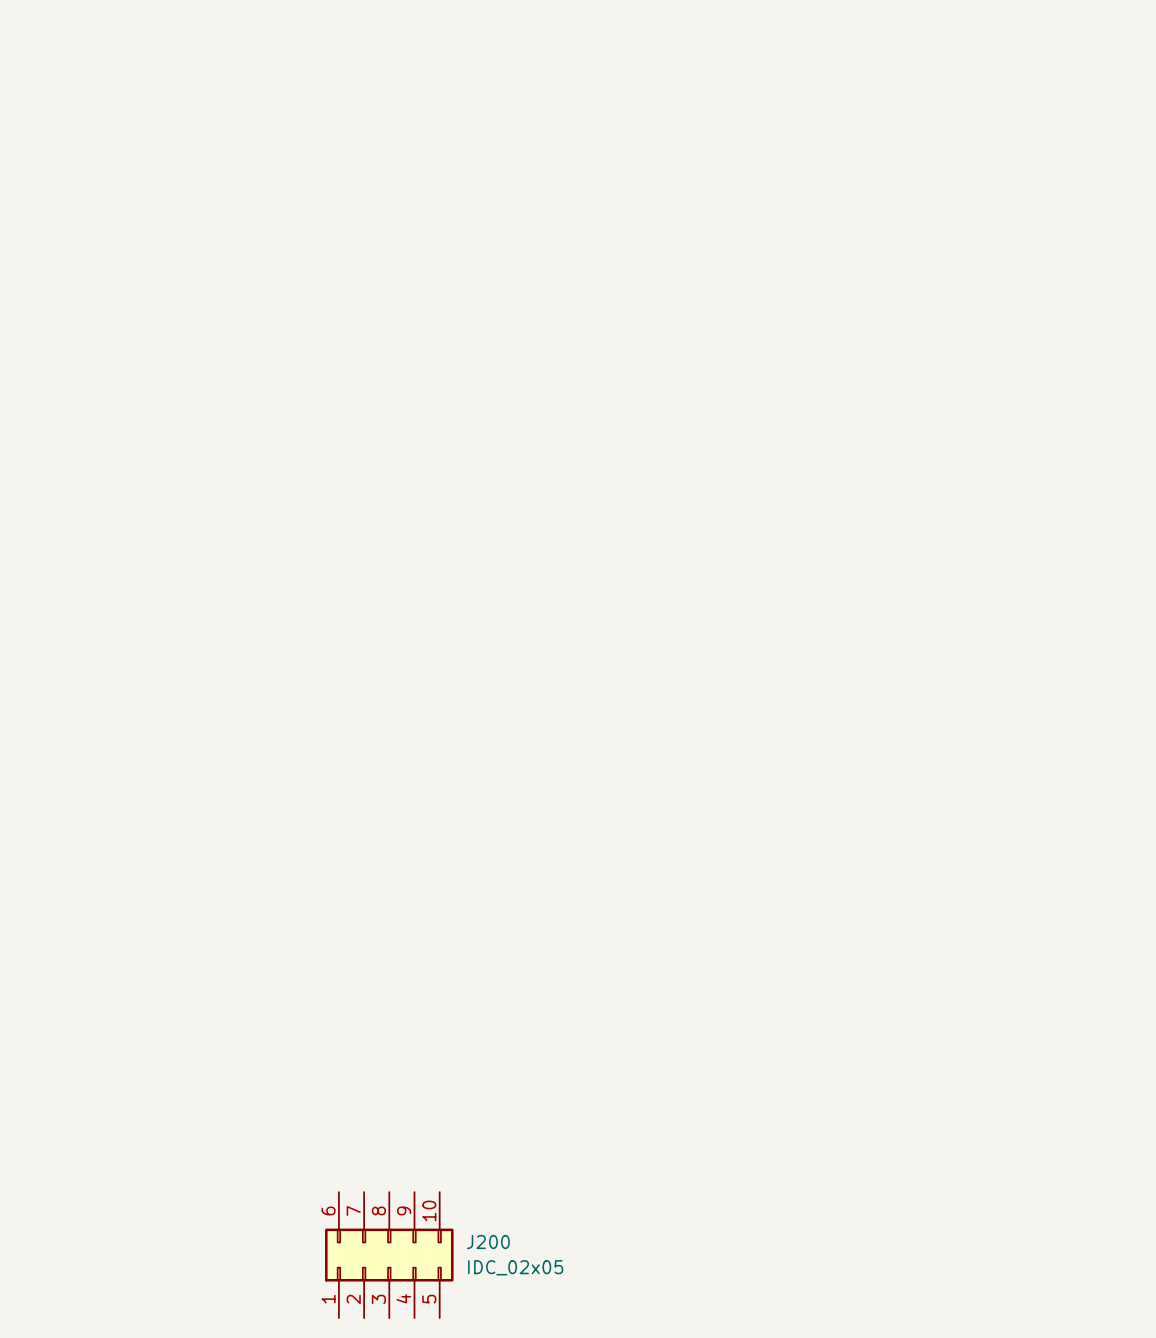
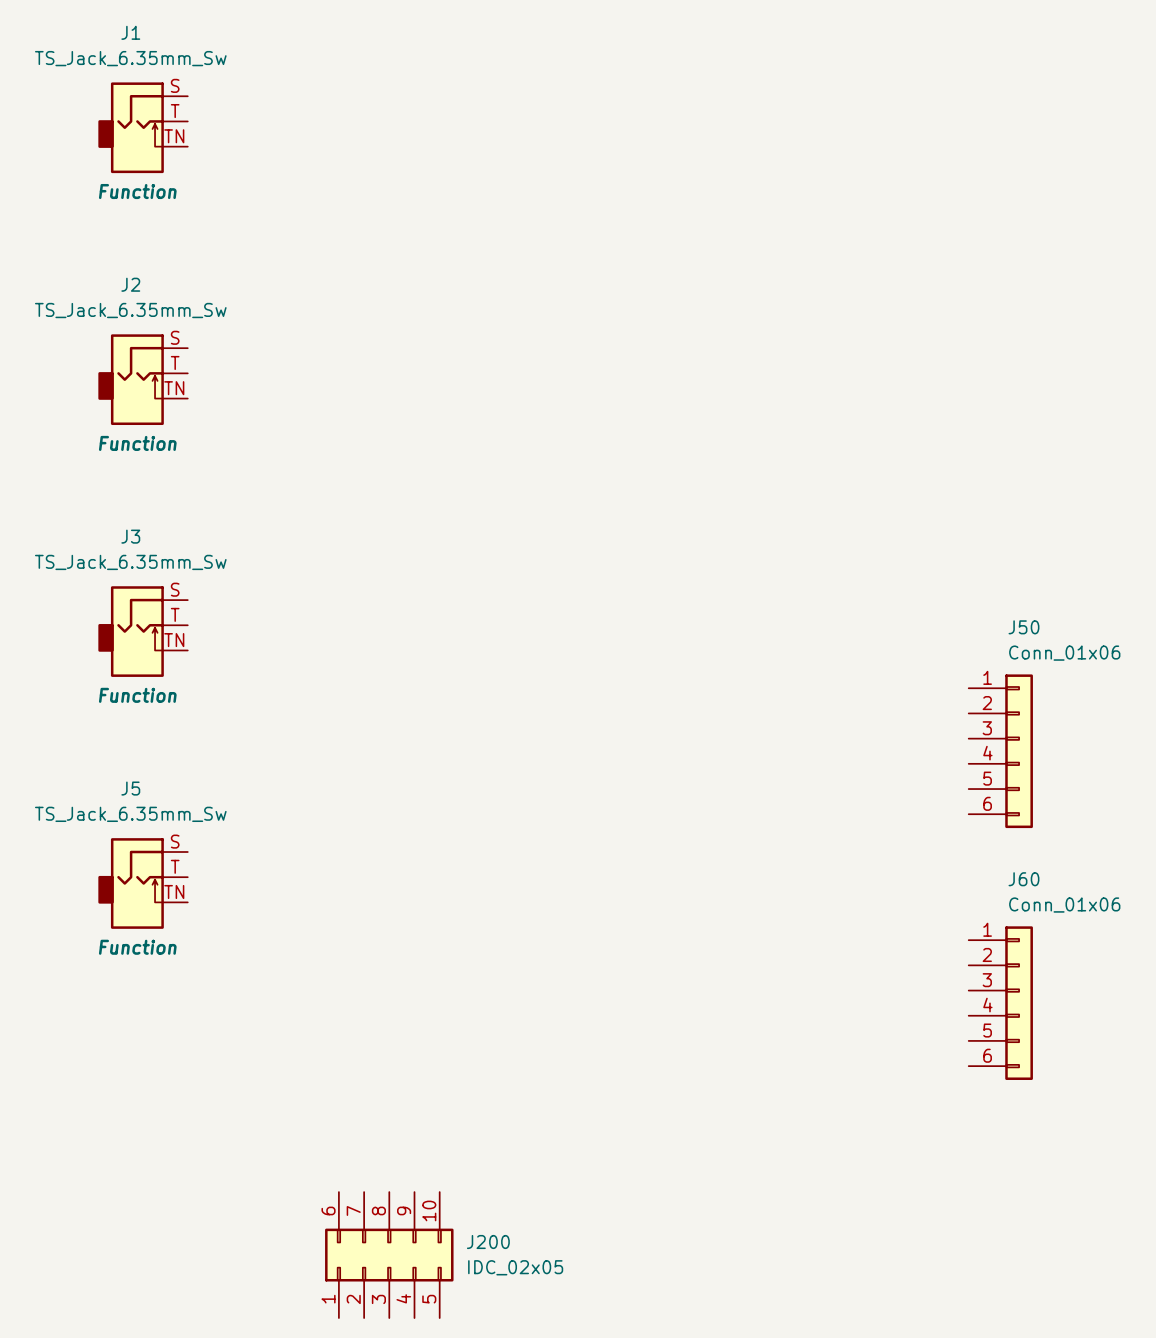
J1: none -> TS_Jack_6.35mm_Sw (143, 127)
J2: none -> TS_Jack_6.35mm_Sw (143, 379)
J3: none -> TS_Jack_6.35mm_Sw (143, 631)
J50: none -> Conn_01x06 (1000, 751)
J5: none -> TS_Jack_6.35mm_Sw (143, 883)
J60: none -> Conn_01x06 (1000, 1003)

